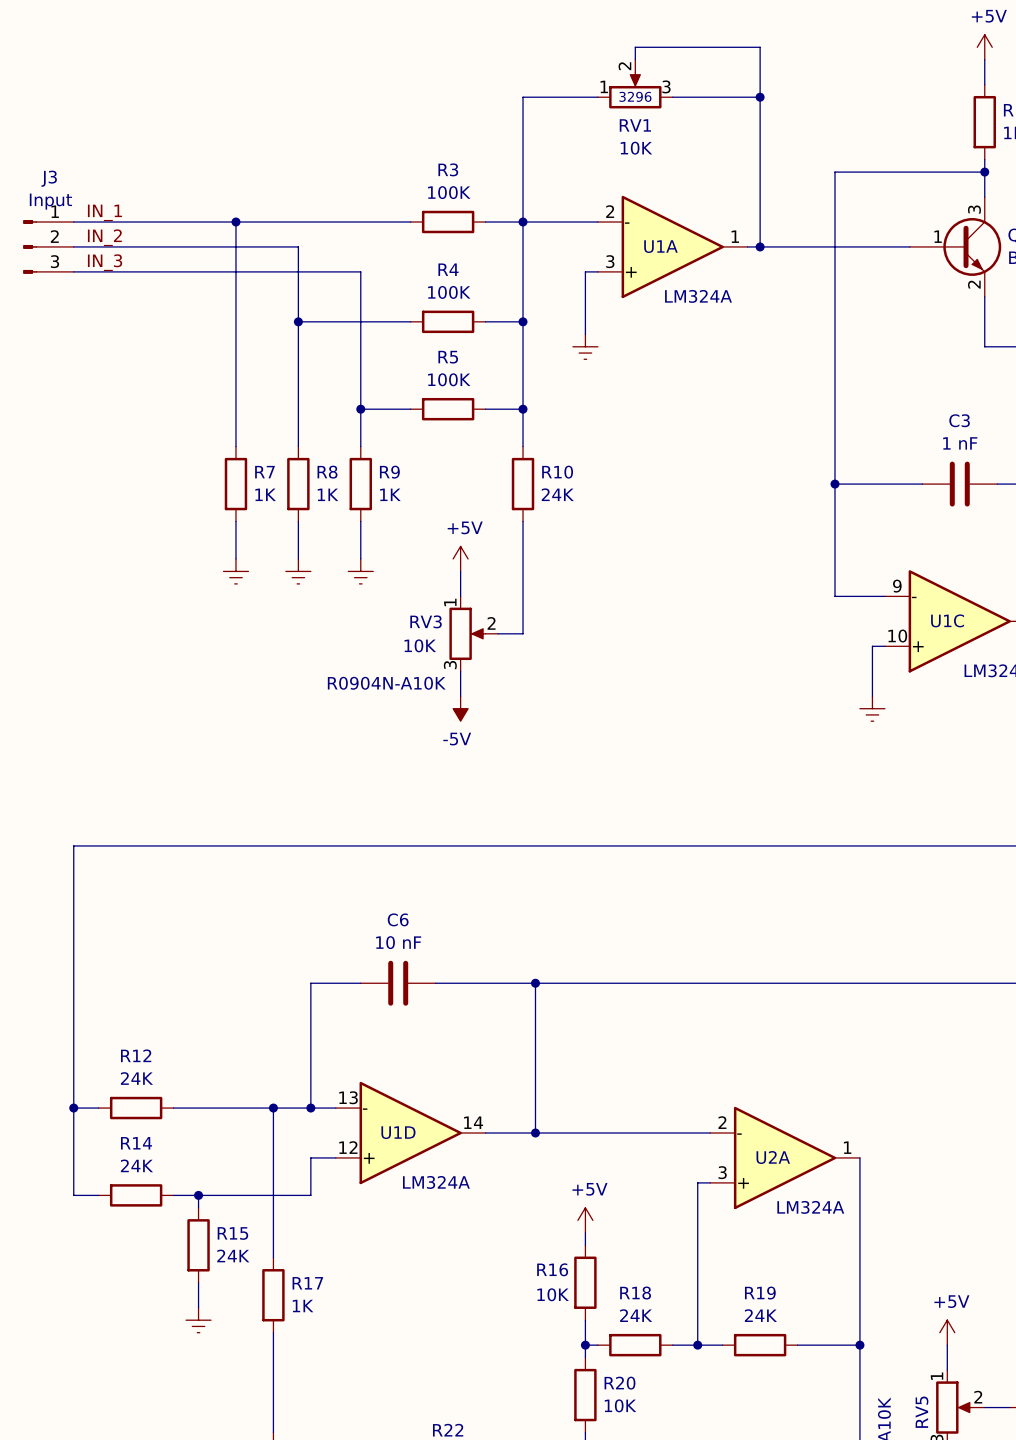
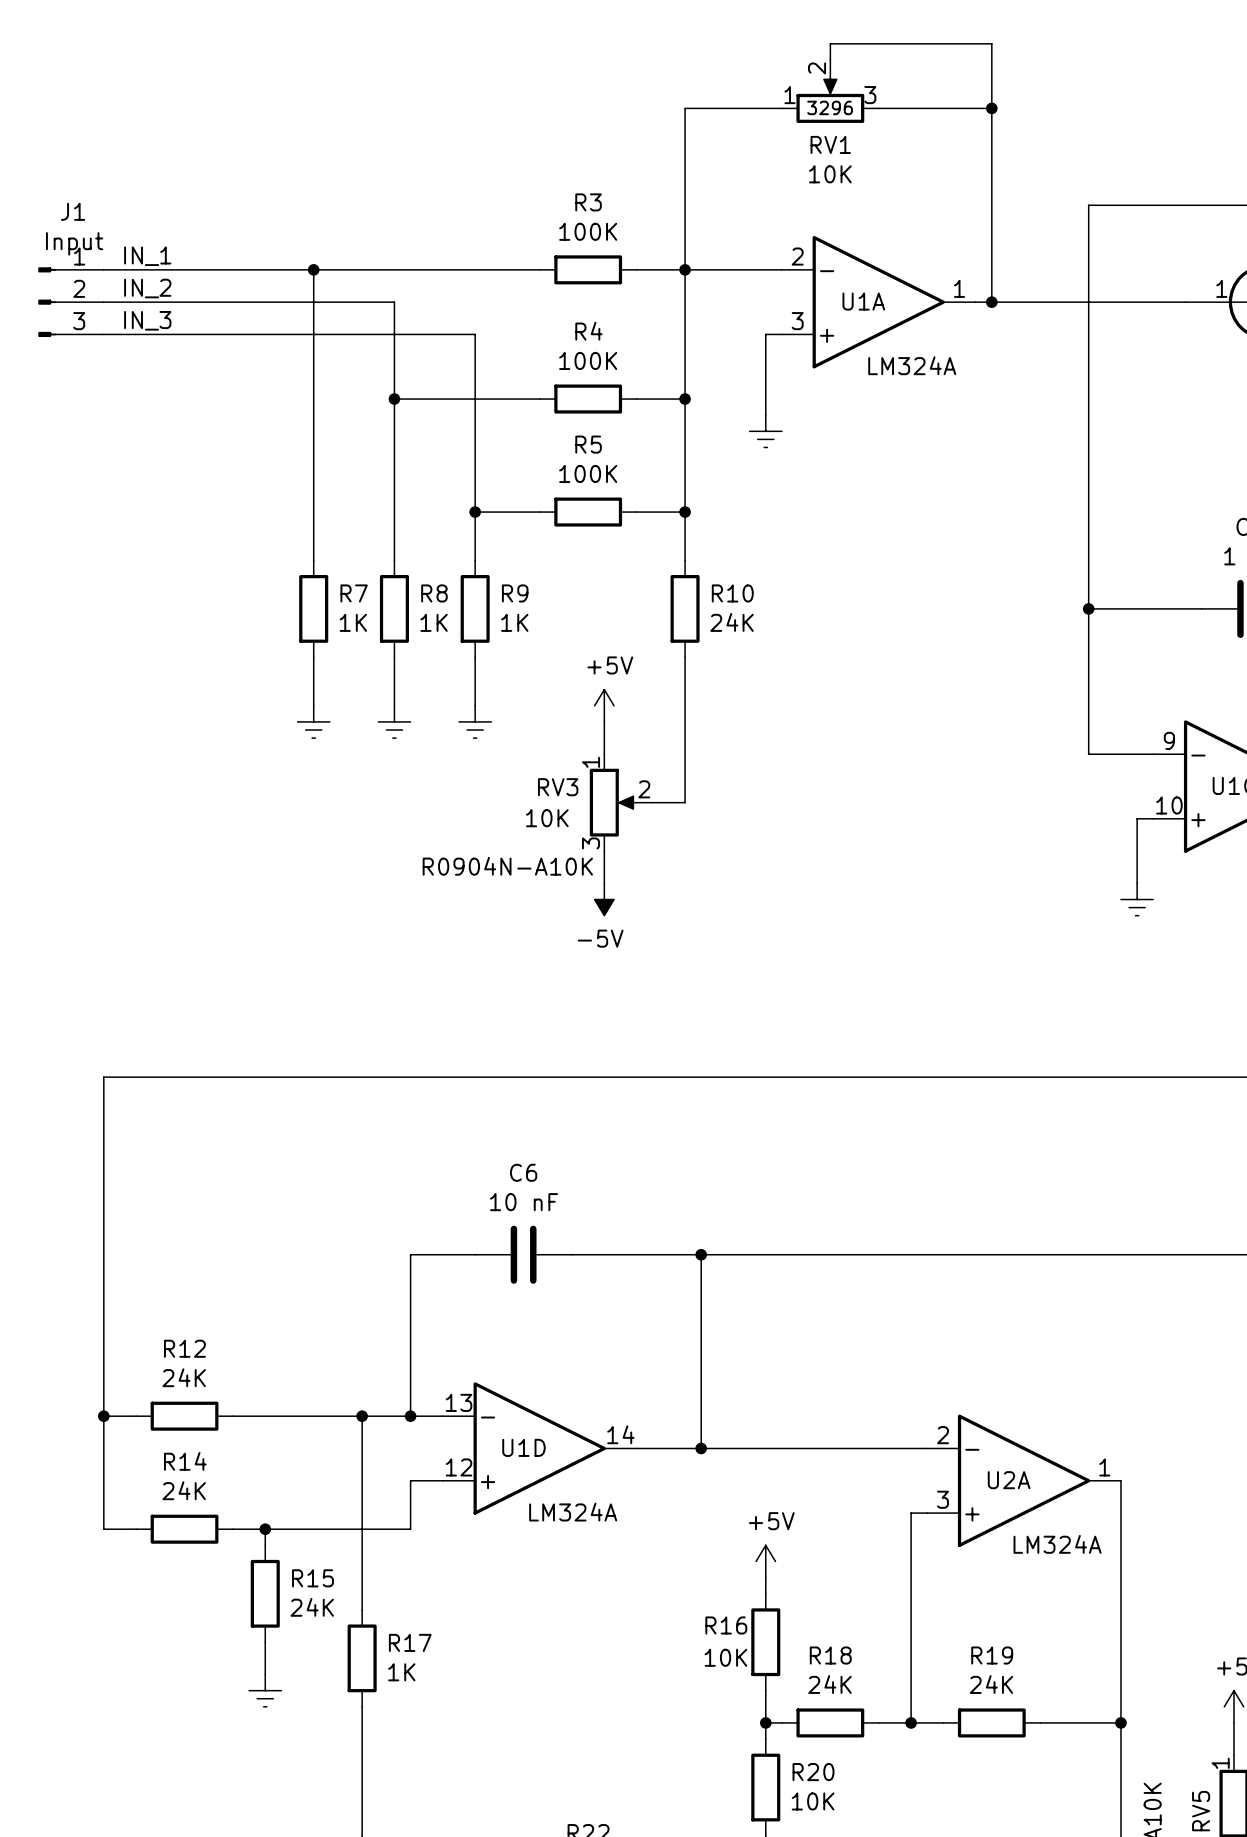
J3 name: J3 (49, 178) -> J1 (73, 211)

